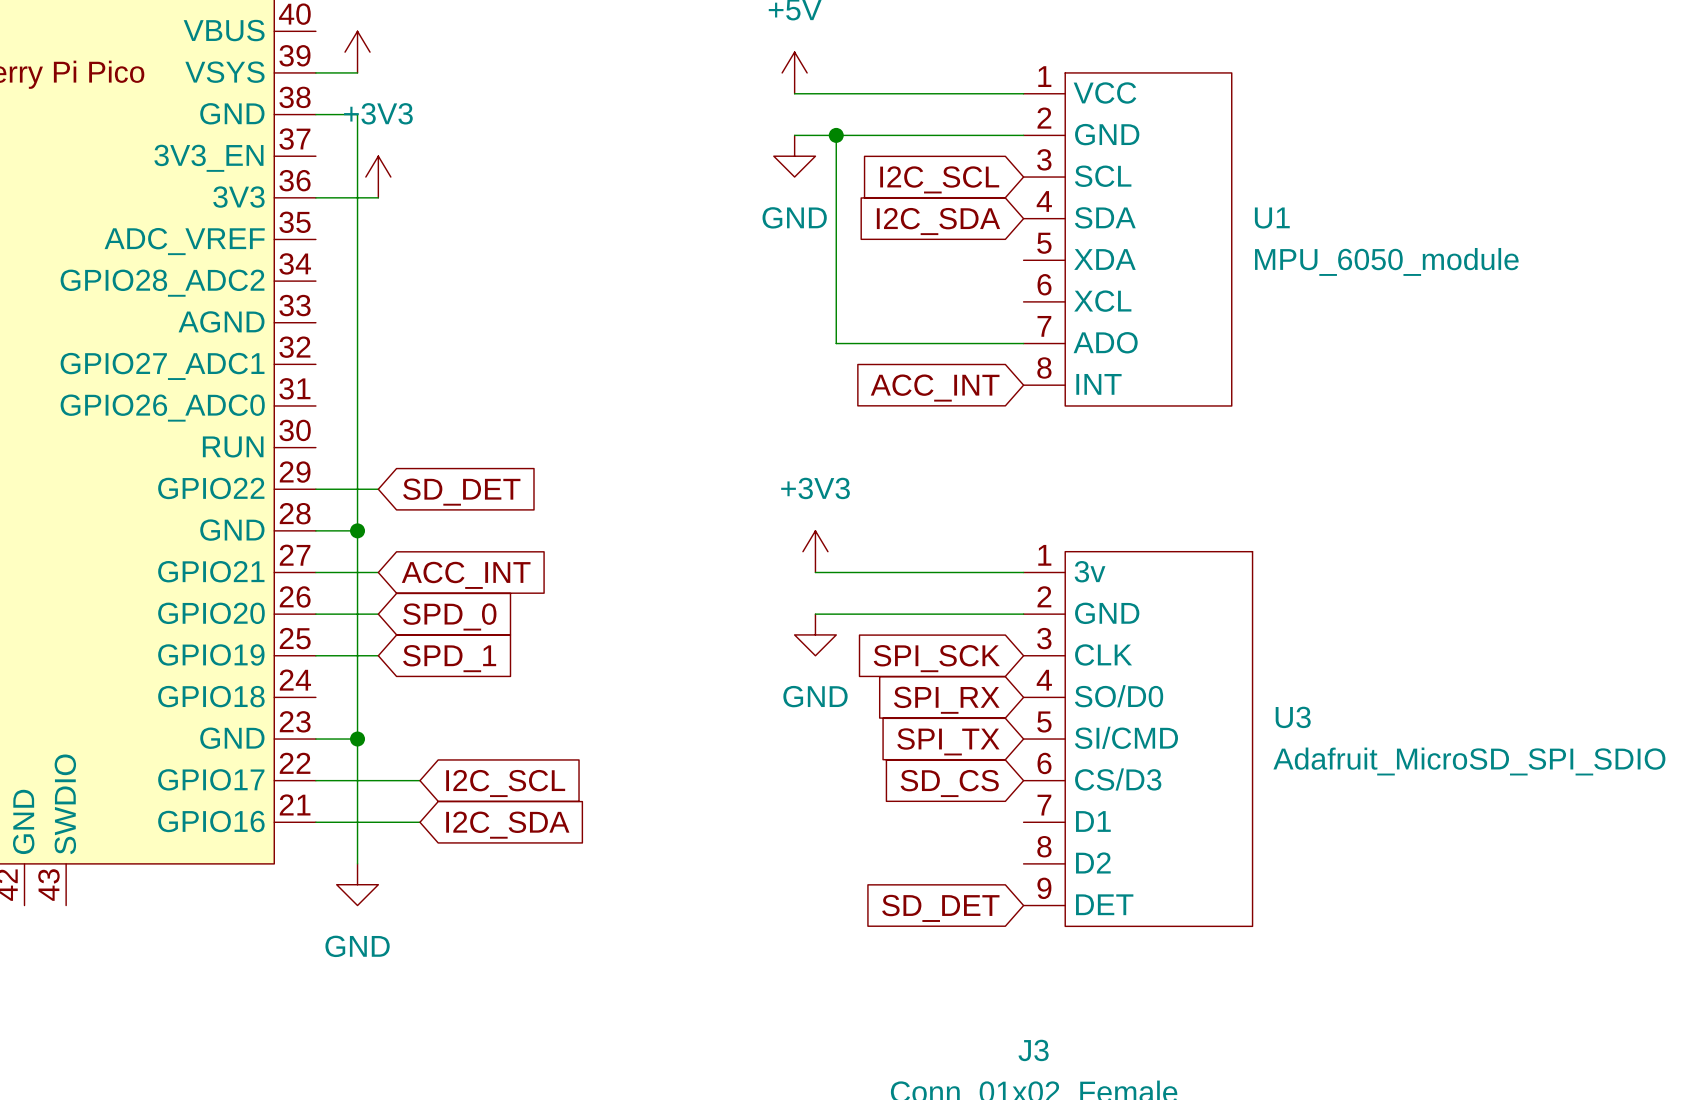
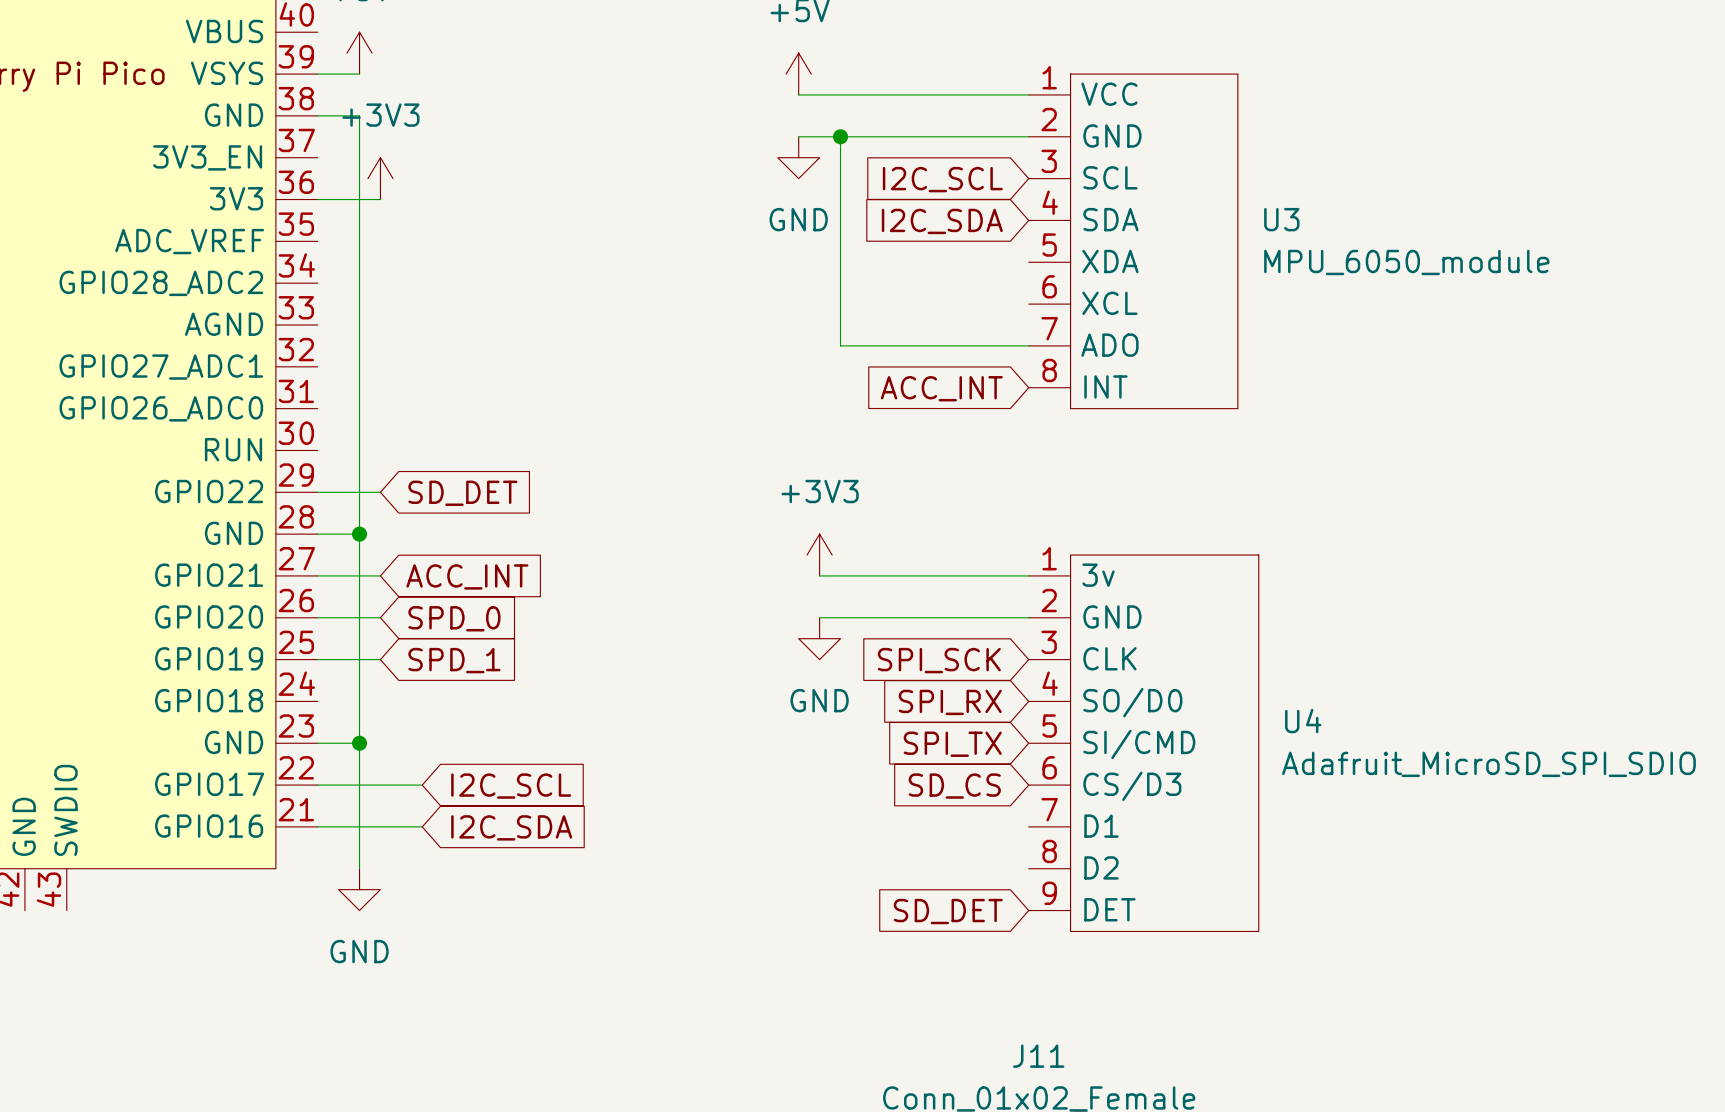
U1 name: U1 (1272, 218) -> U3 (1281, 219)
U3 name: U3 (1293, 717) -> U4 (1303, 721)
J3 name: J3 (1033, 1050) -> J11 (1038, 1056)

